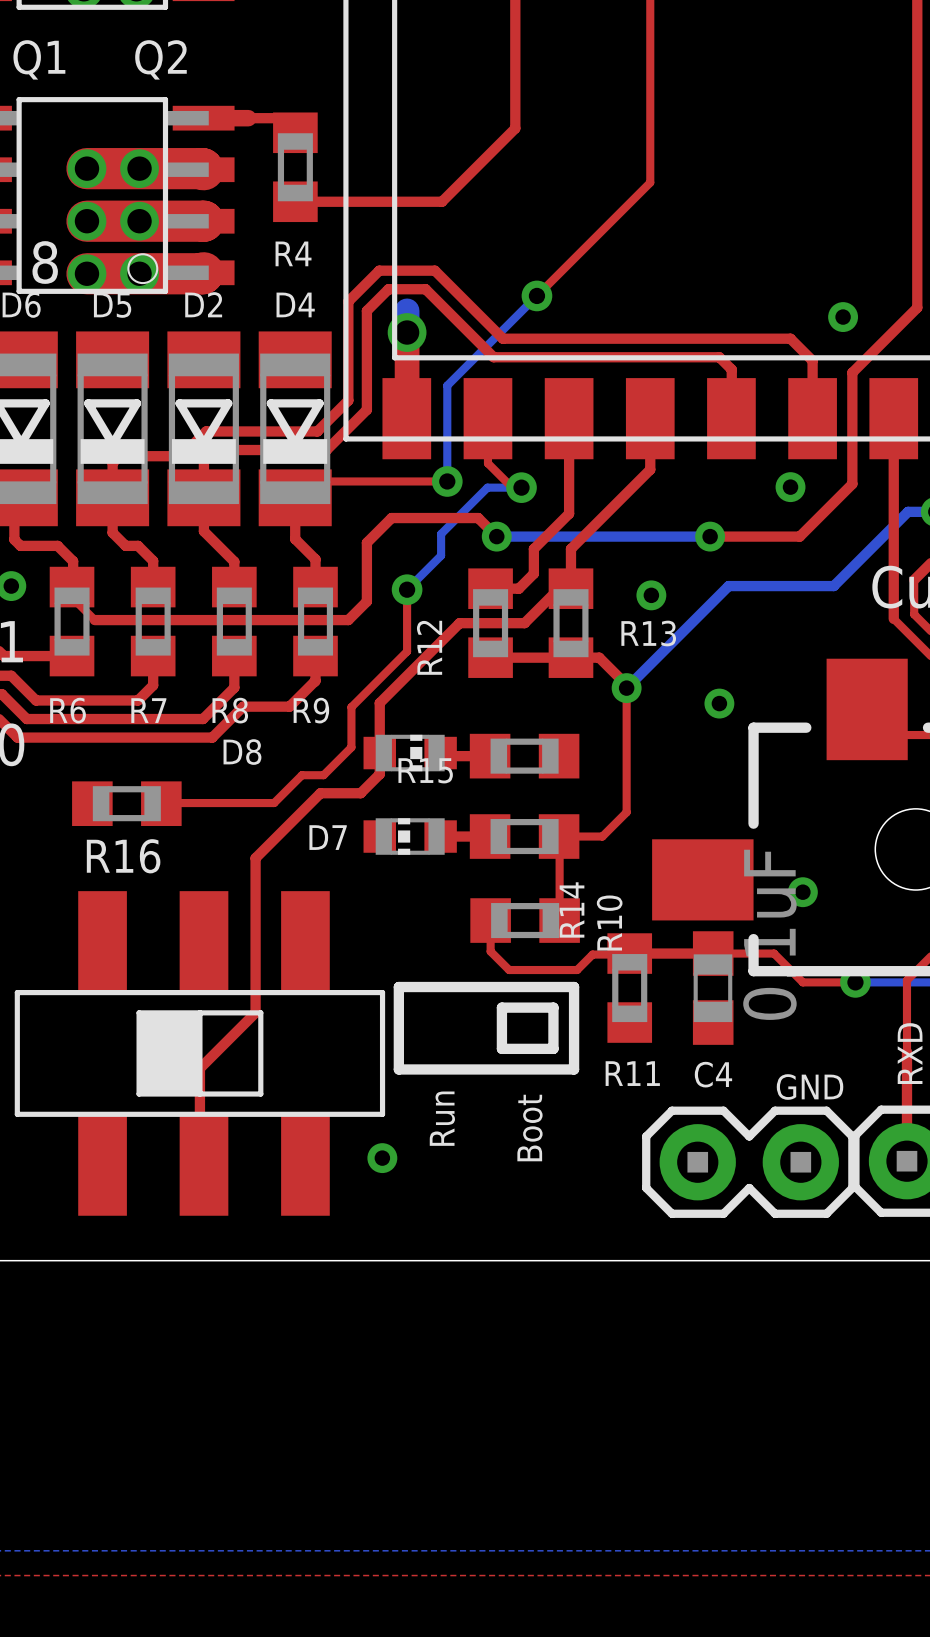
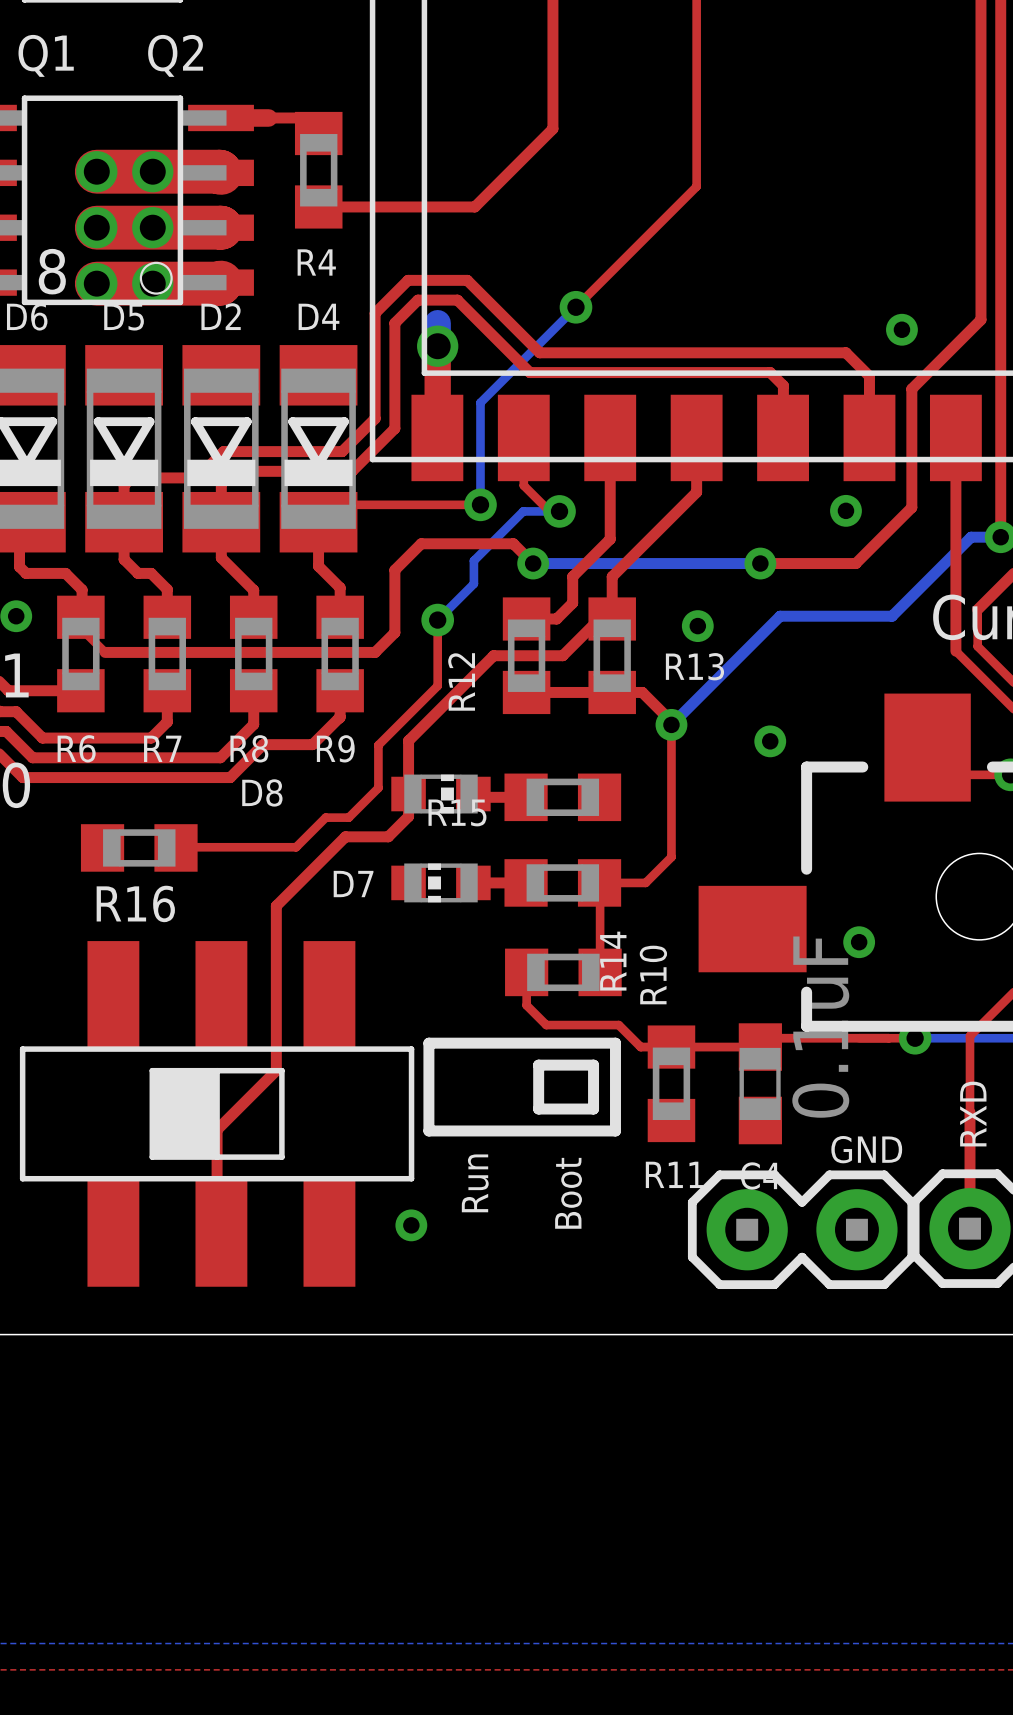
top track: (577, 970) (592, 954) (628, 954) (629, 947) (635, 953) (774, 953) (802, 982) -> (618, 1025) (640, 1047) (760, 1047) (769, 1038) (888, 1038)
R11 position: (629, 988) -> (671, 1083)
C4 position: (713, 988) -> (760, 1083)

